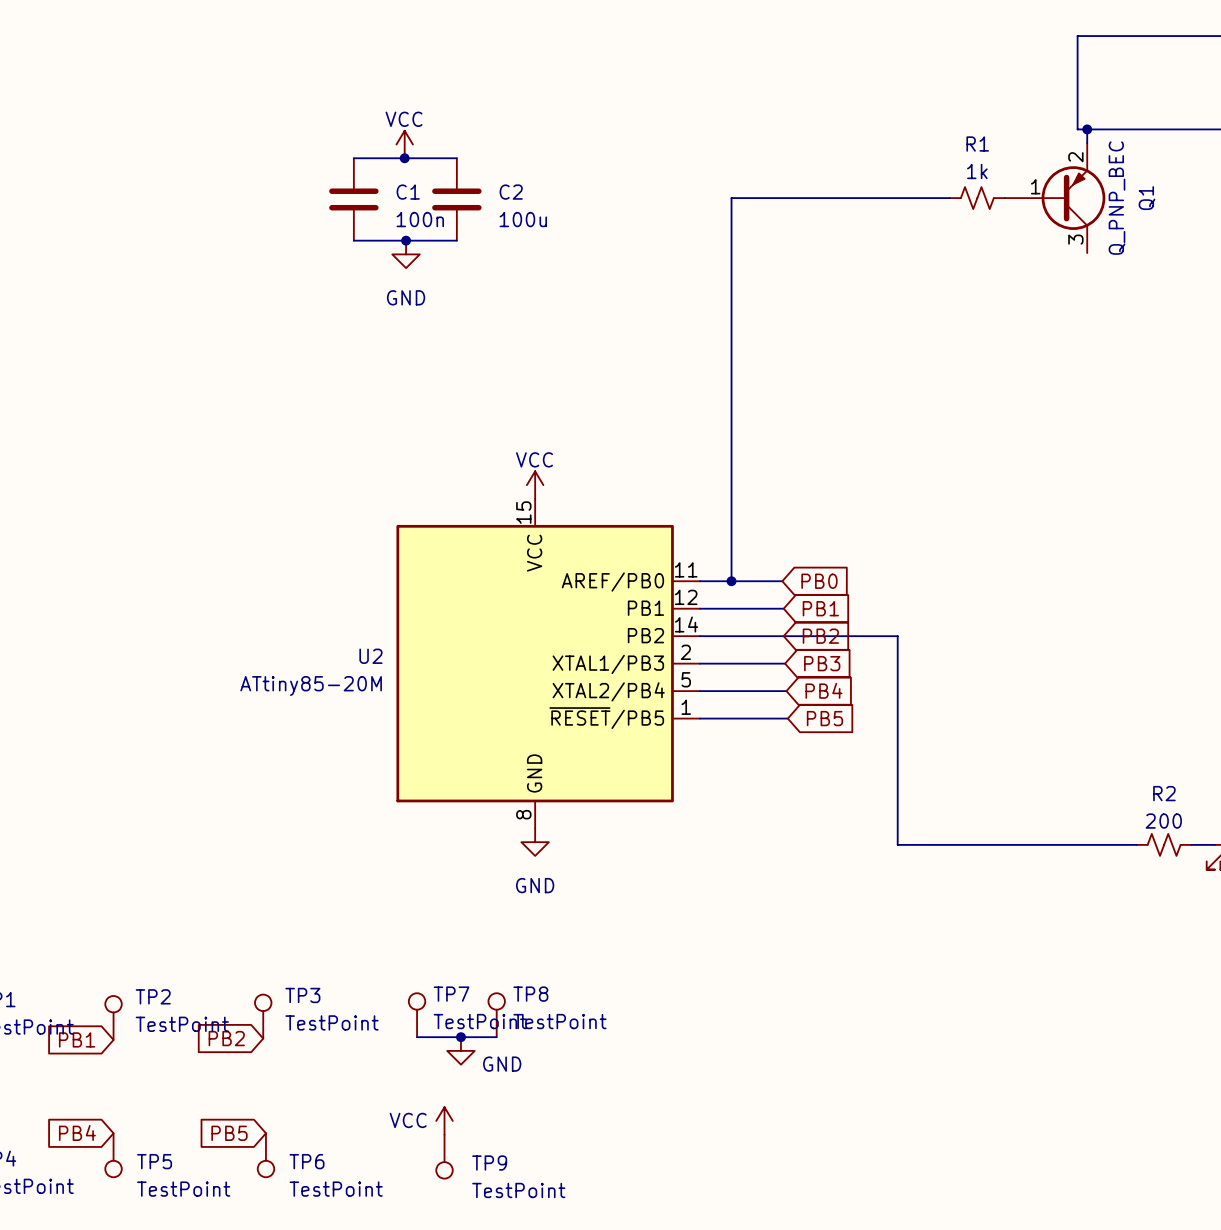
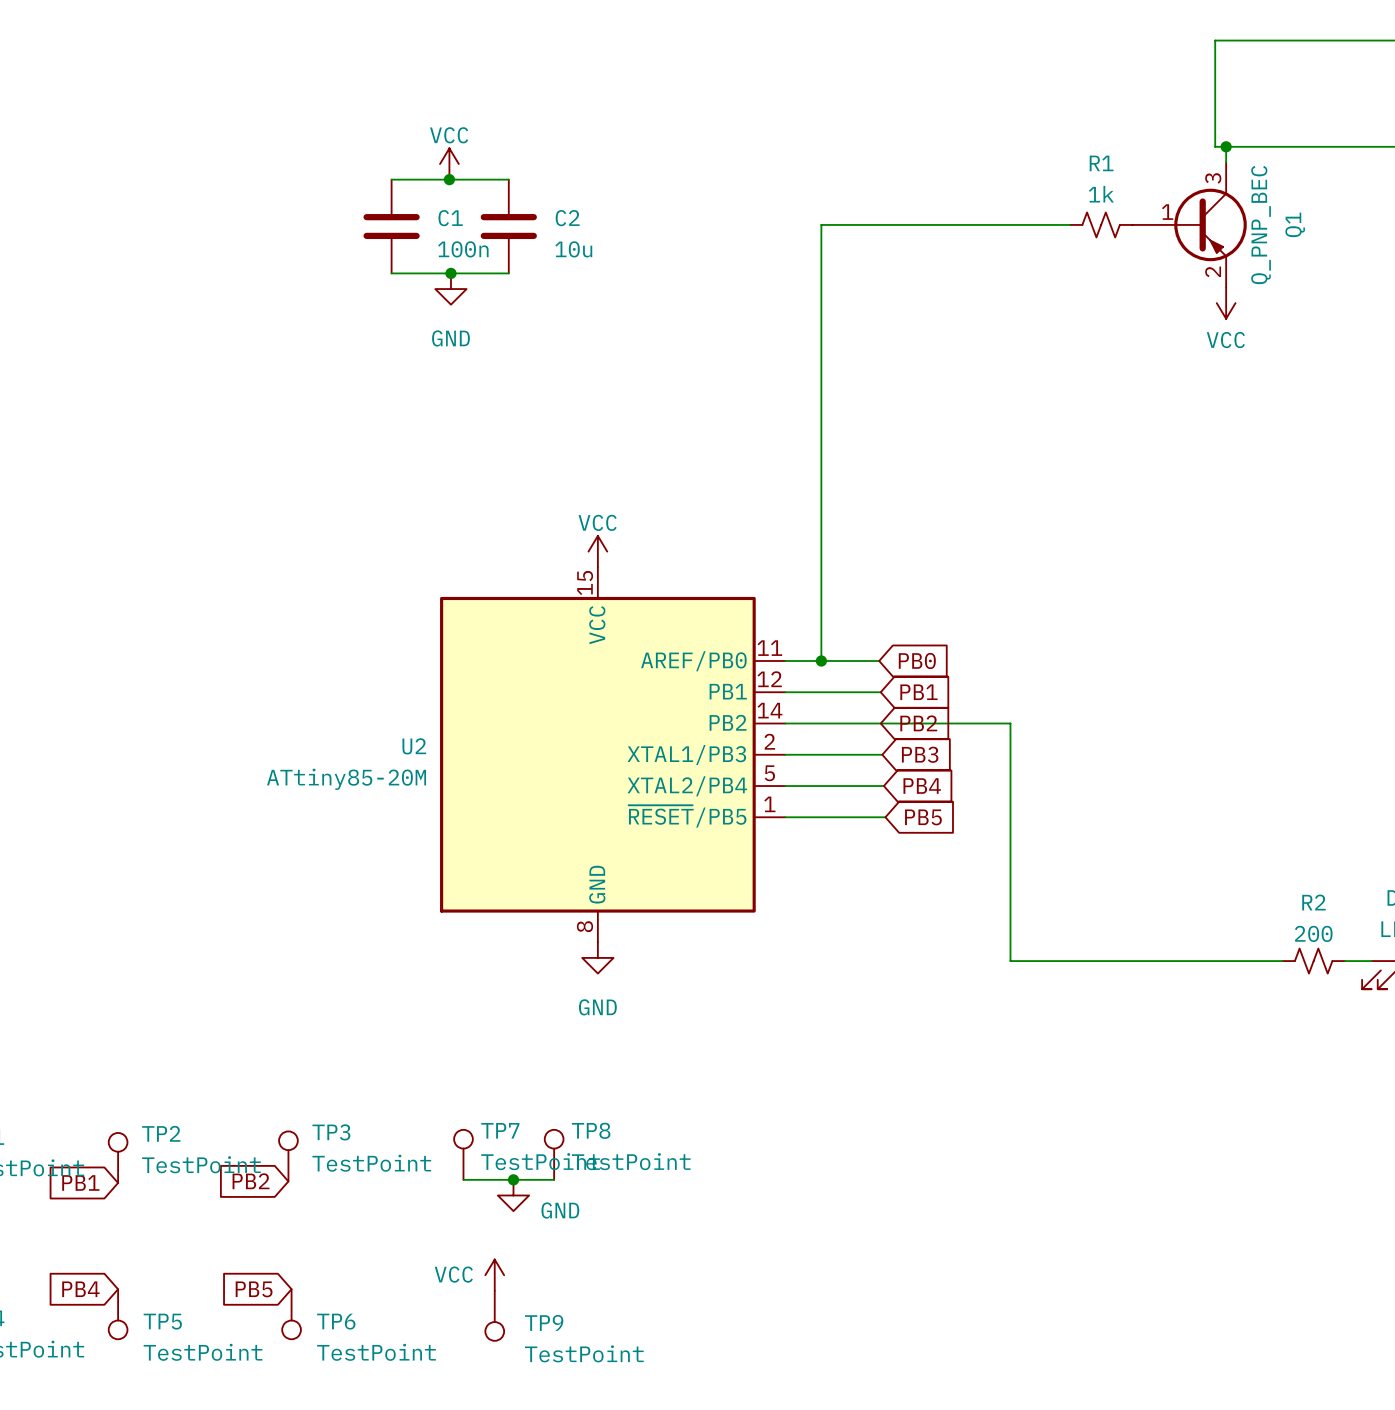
Q1 flip: as is (1073, 198) -> up-down (1210, 224)
C2 value: 100u (523, 219) -> 10u (573, 249)
power symbol: none -> VCC (1226, 303)

